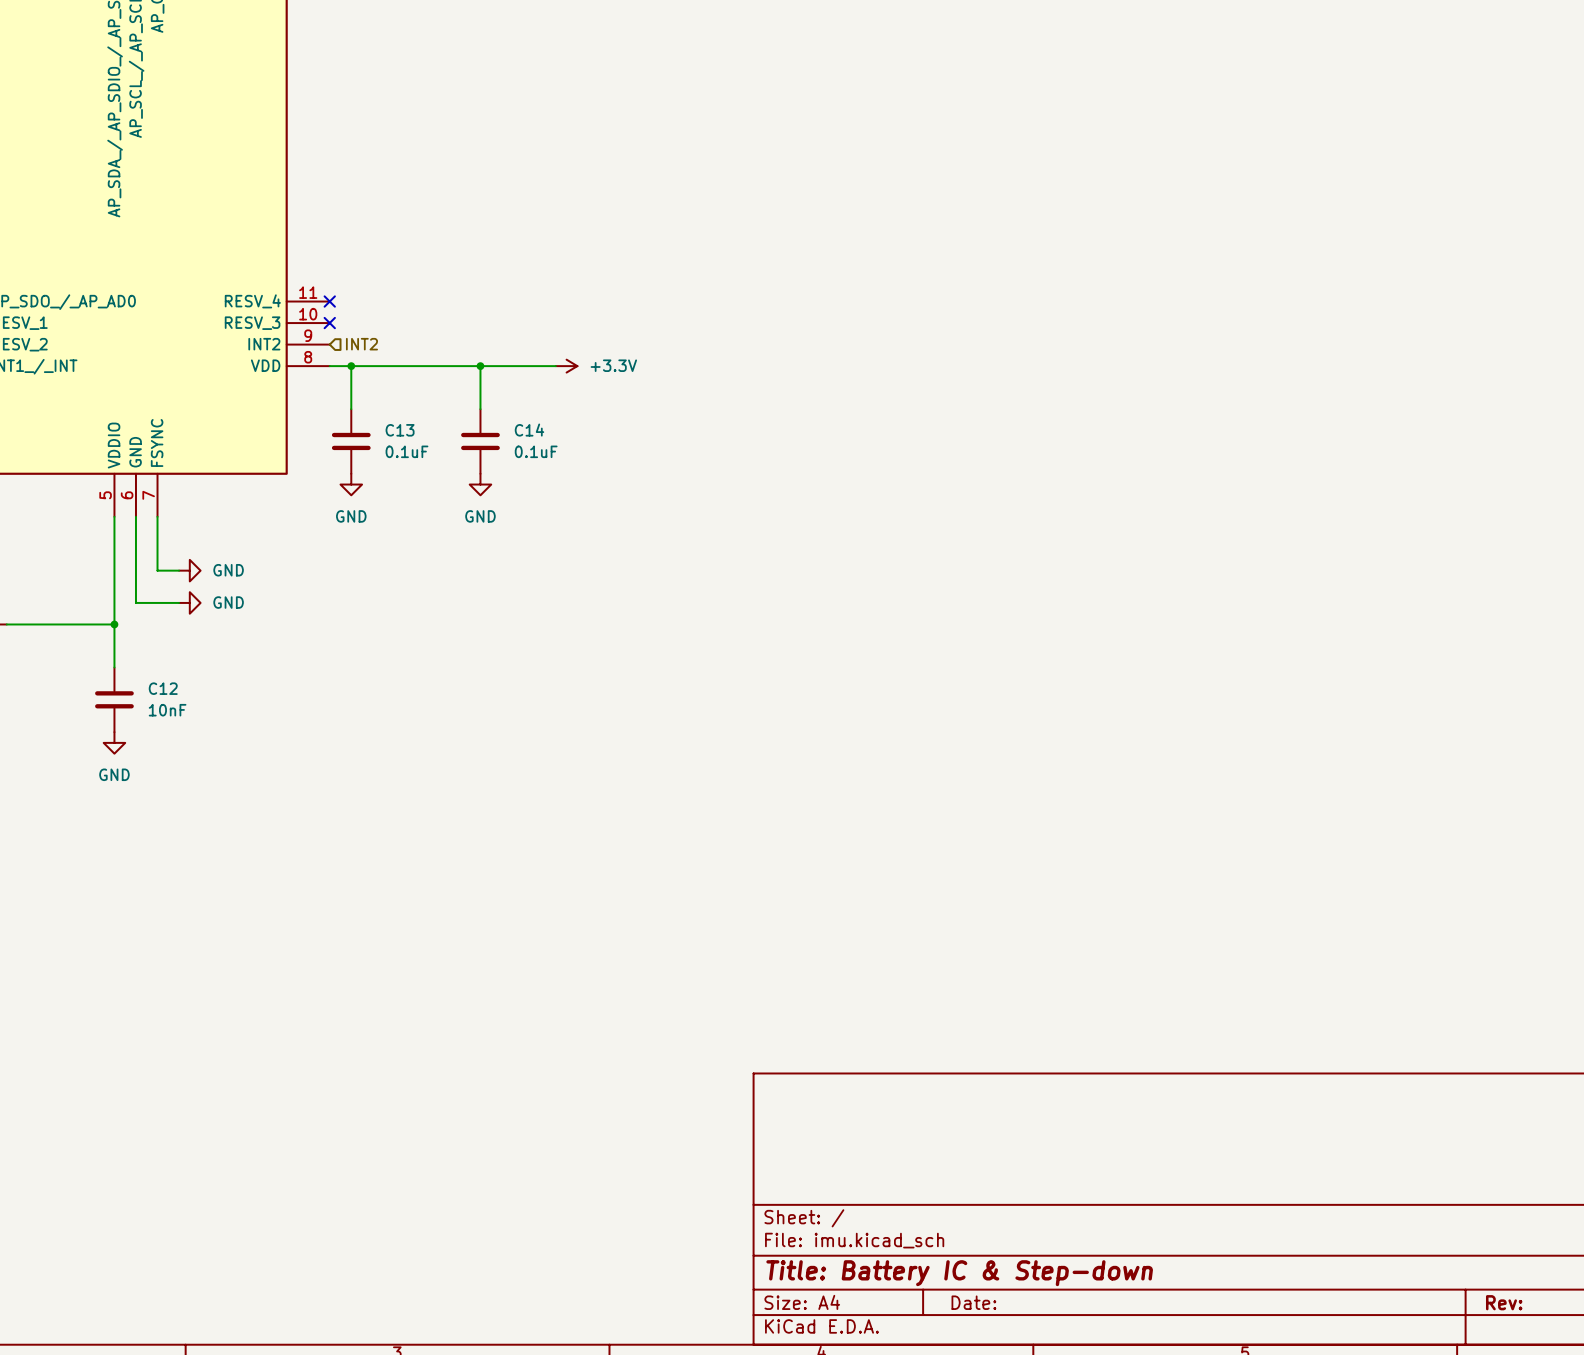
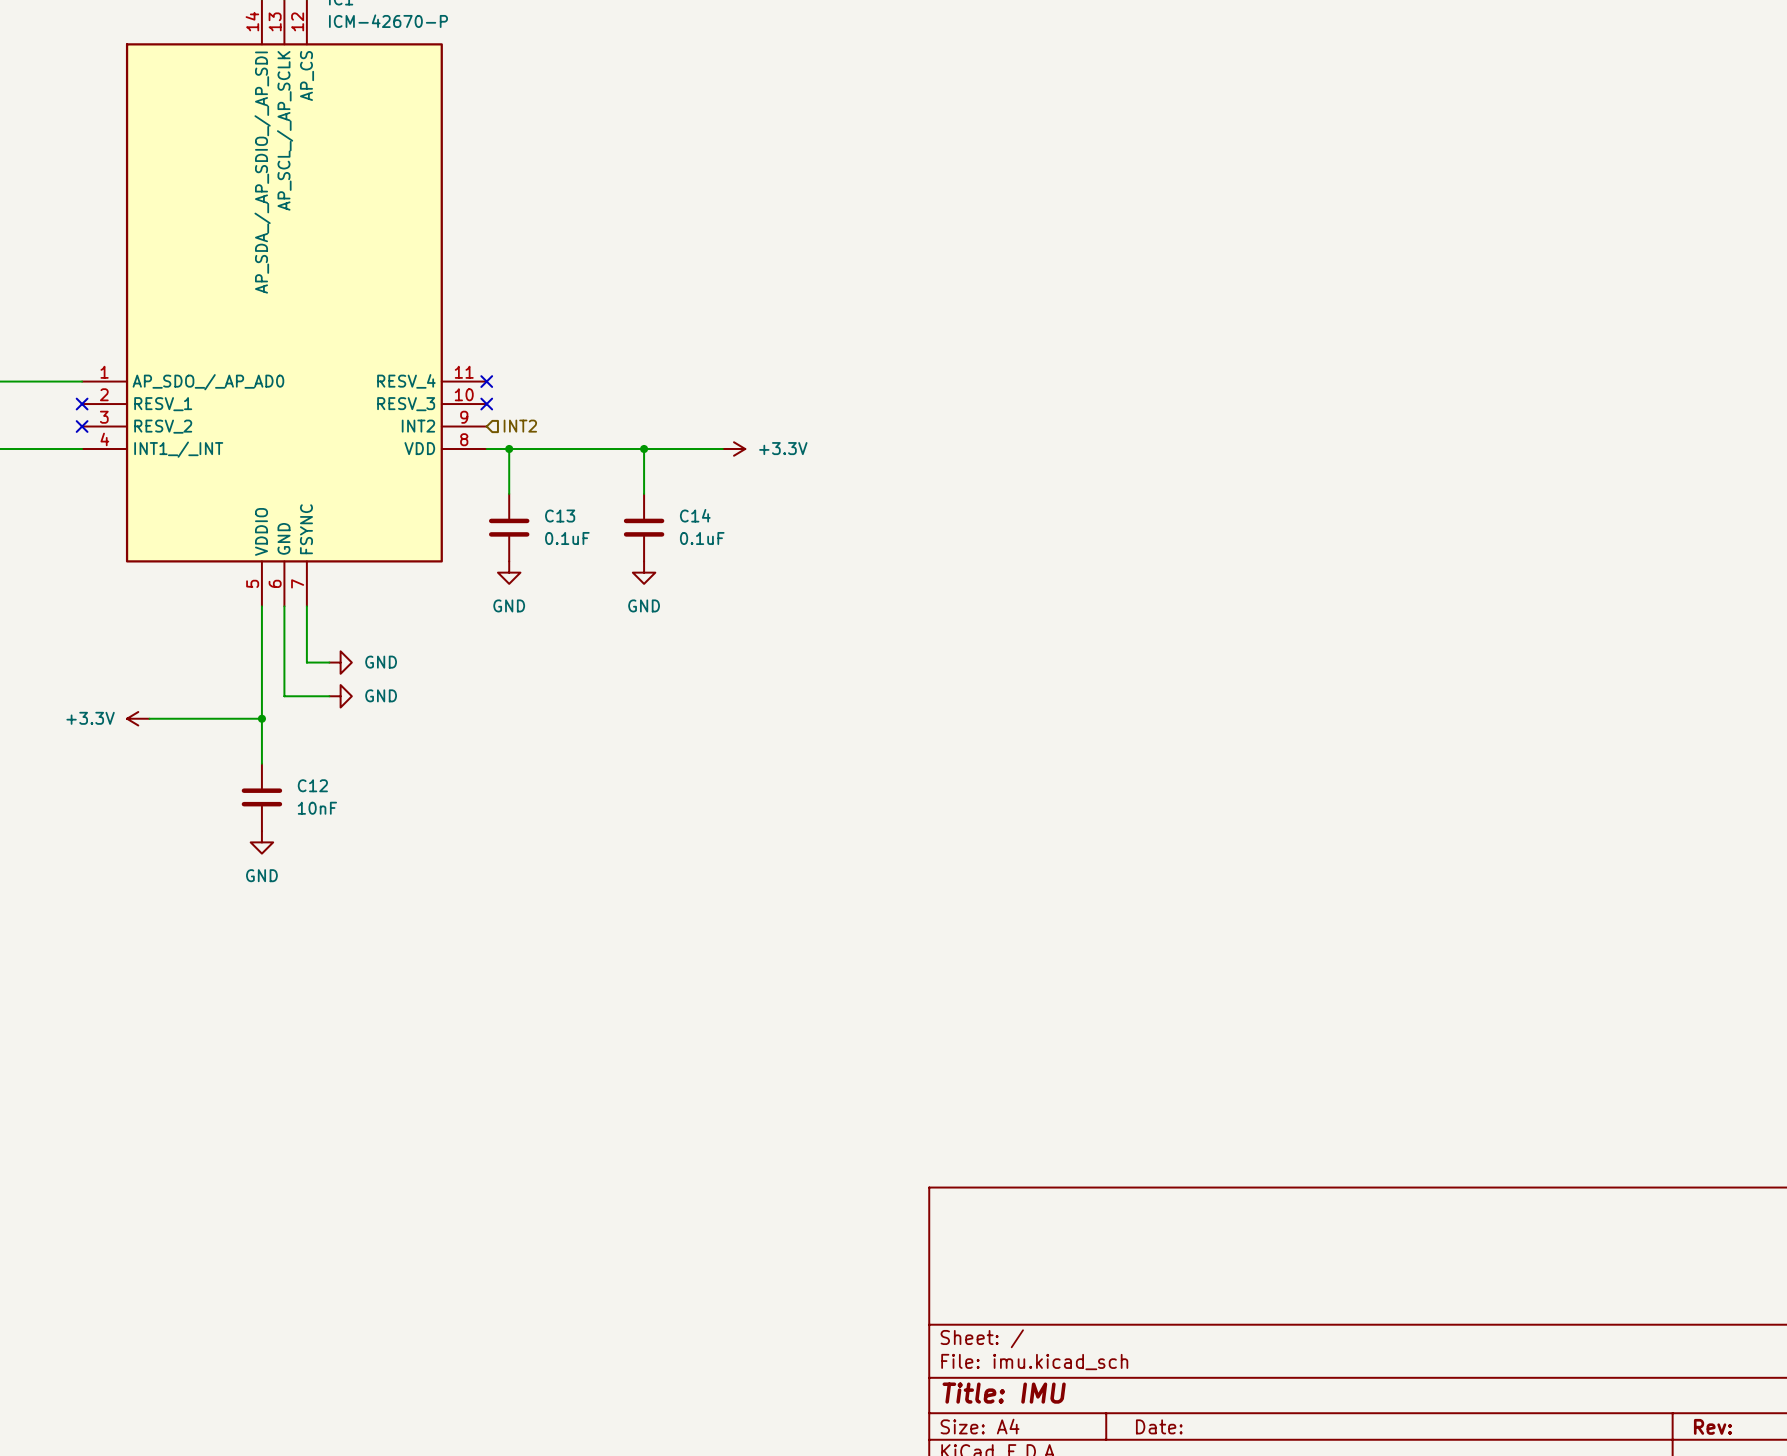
title block: Title: Battery IC & Step-down (959, 1273) -> Title: IMU (1004, 1393)

